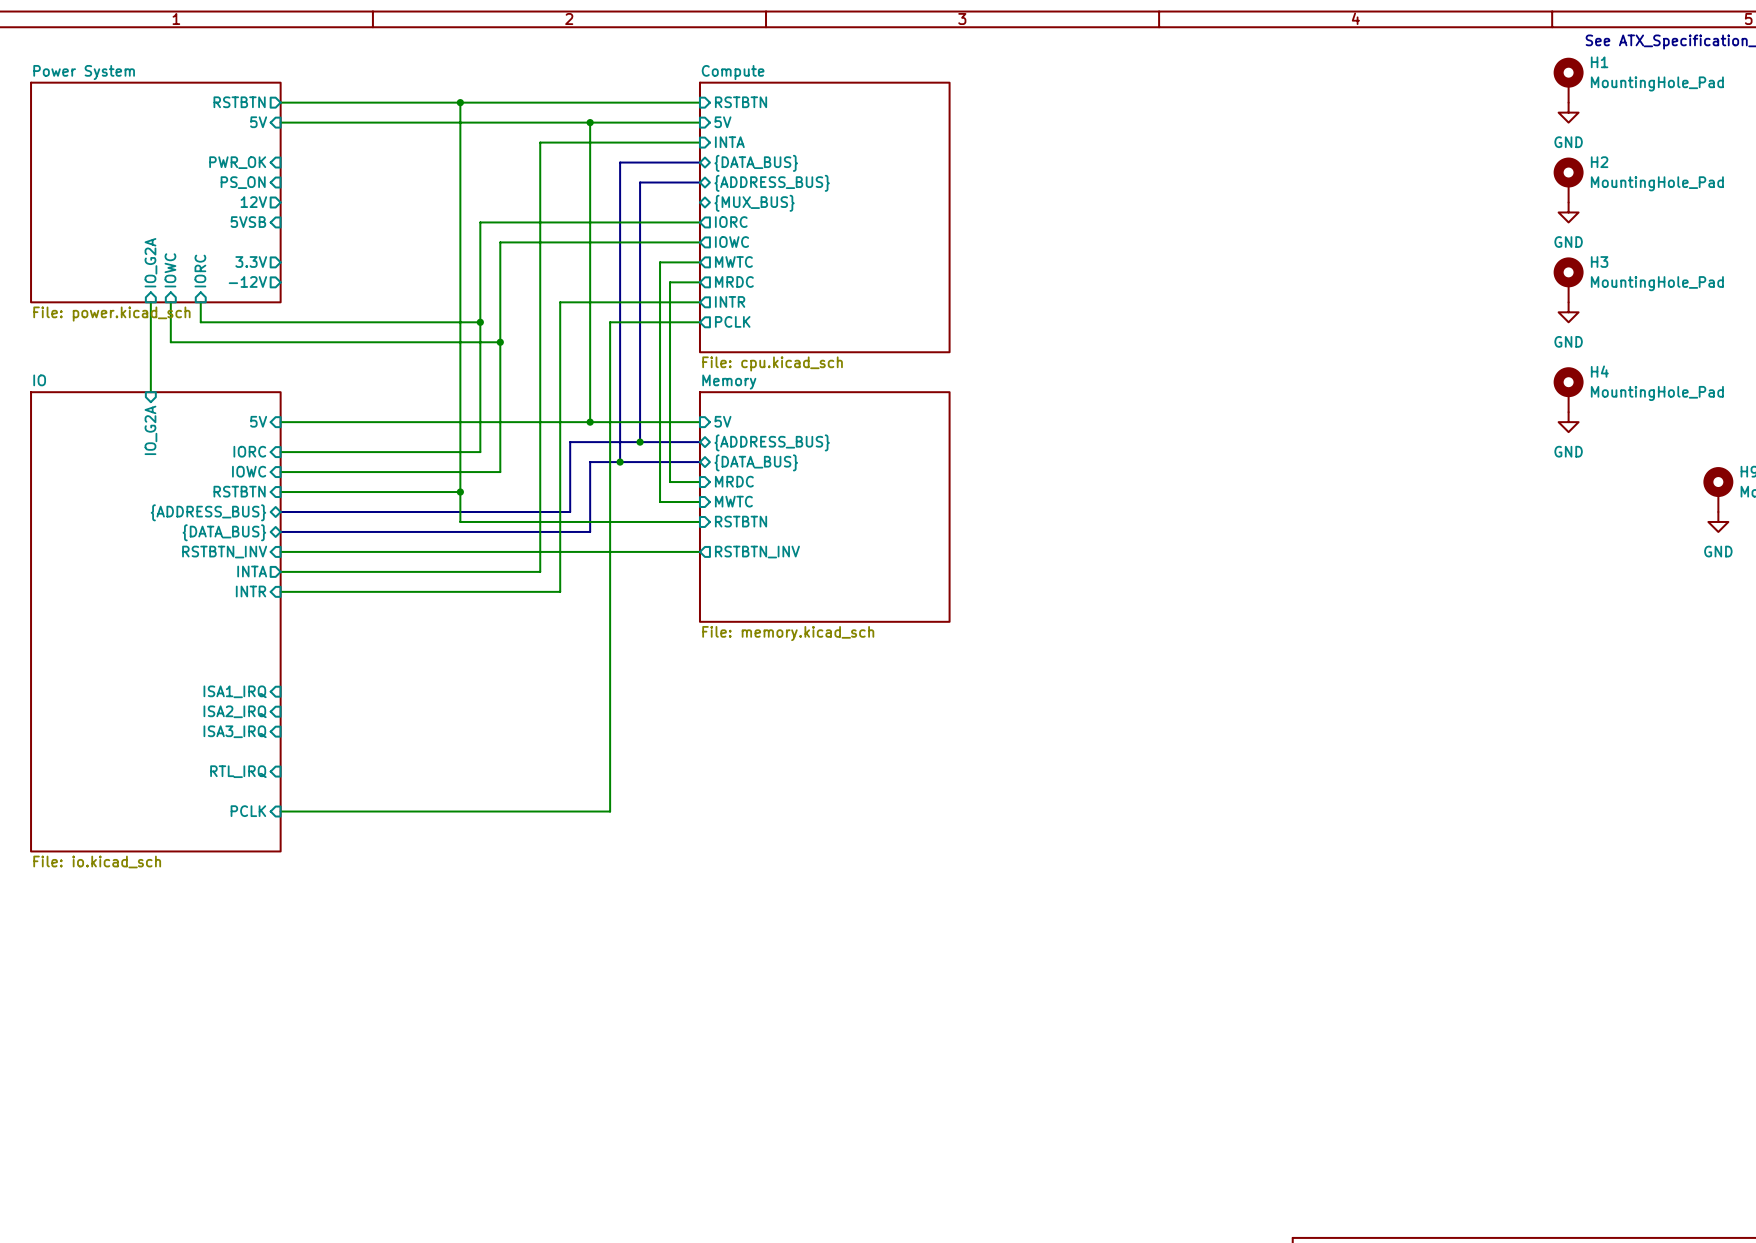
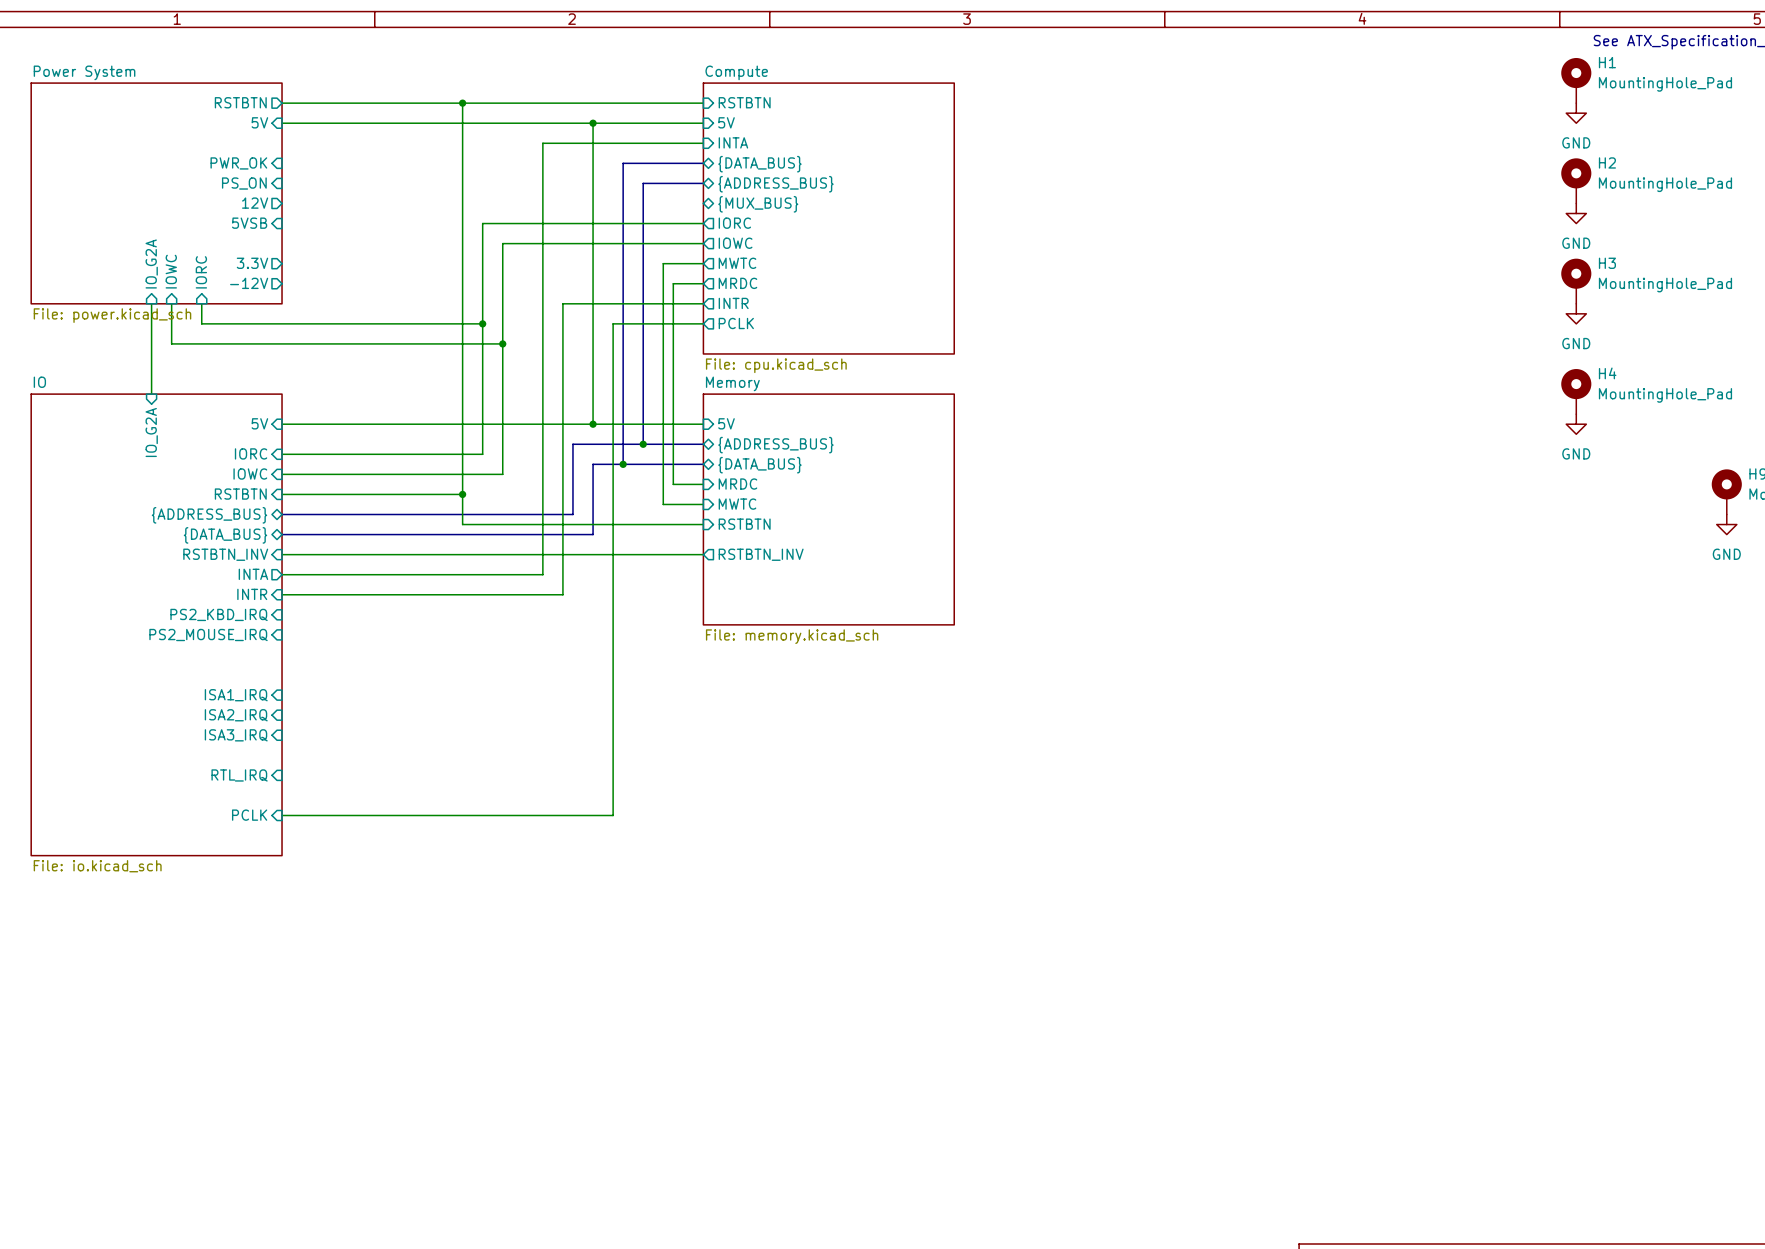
sheet pin: none -> PS2_KBD_IRQ (219, 614)
sheet pin: none -> PS2_MOUSE_IRQ (208, 635)

